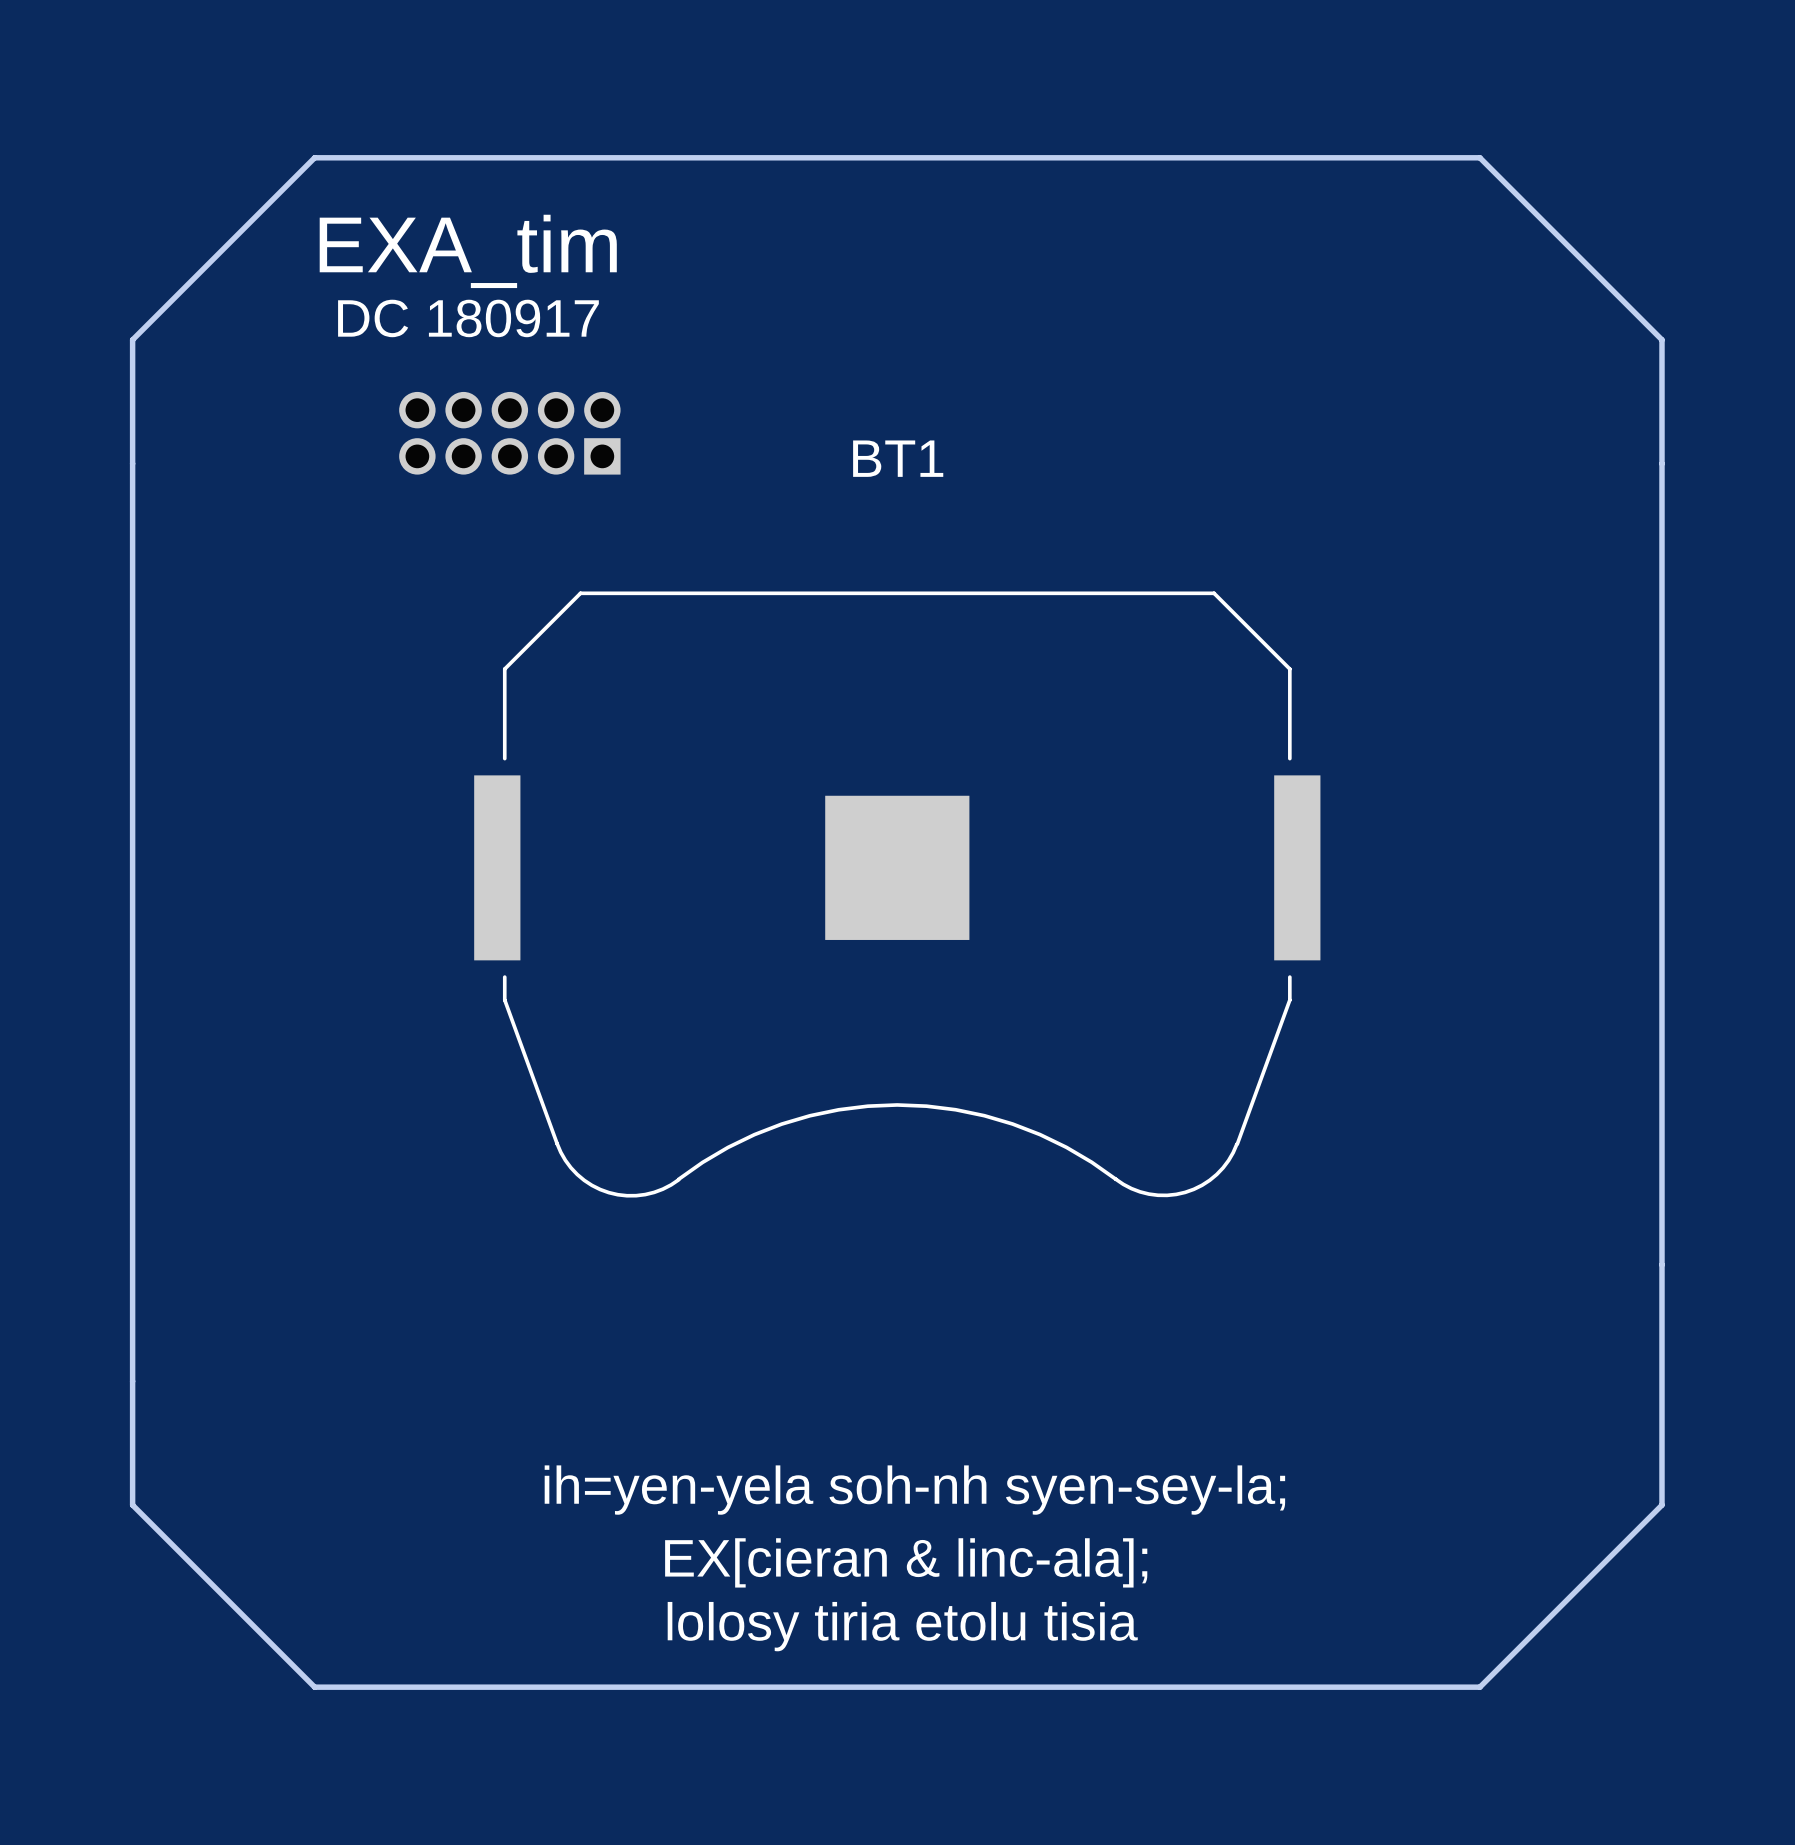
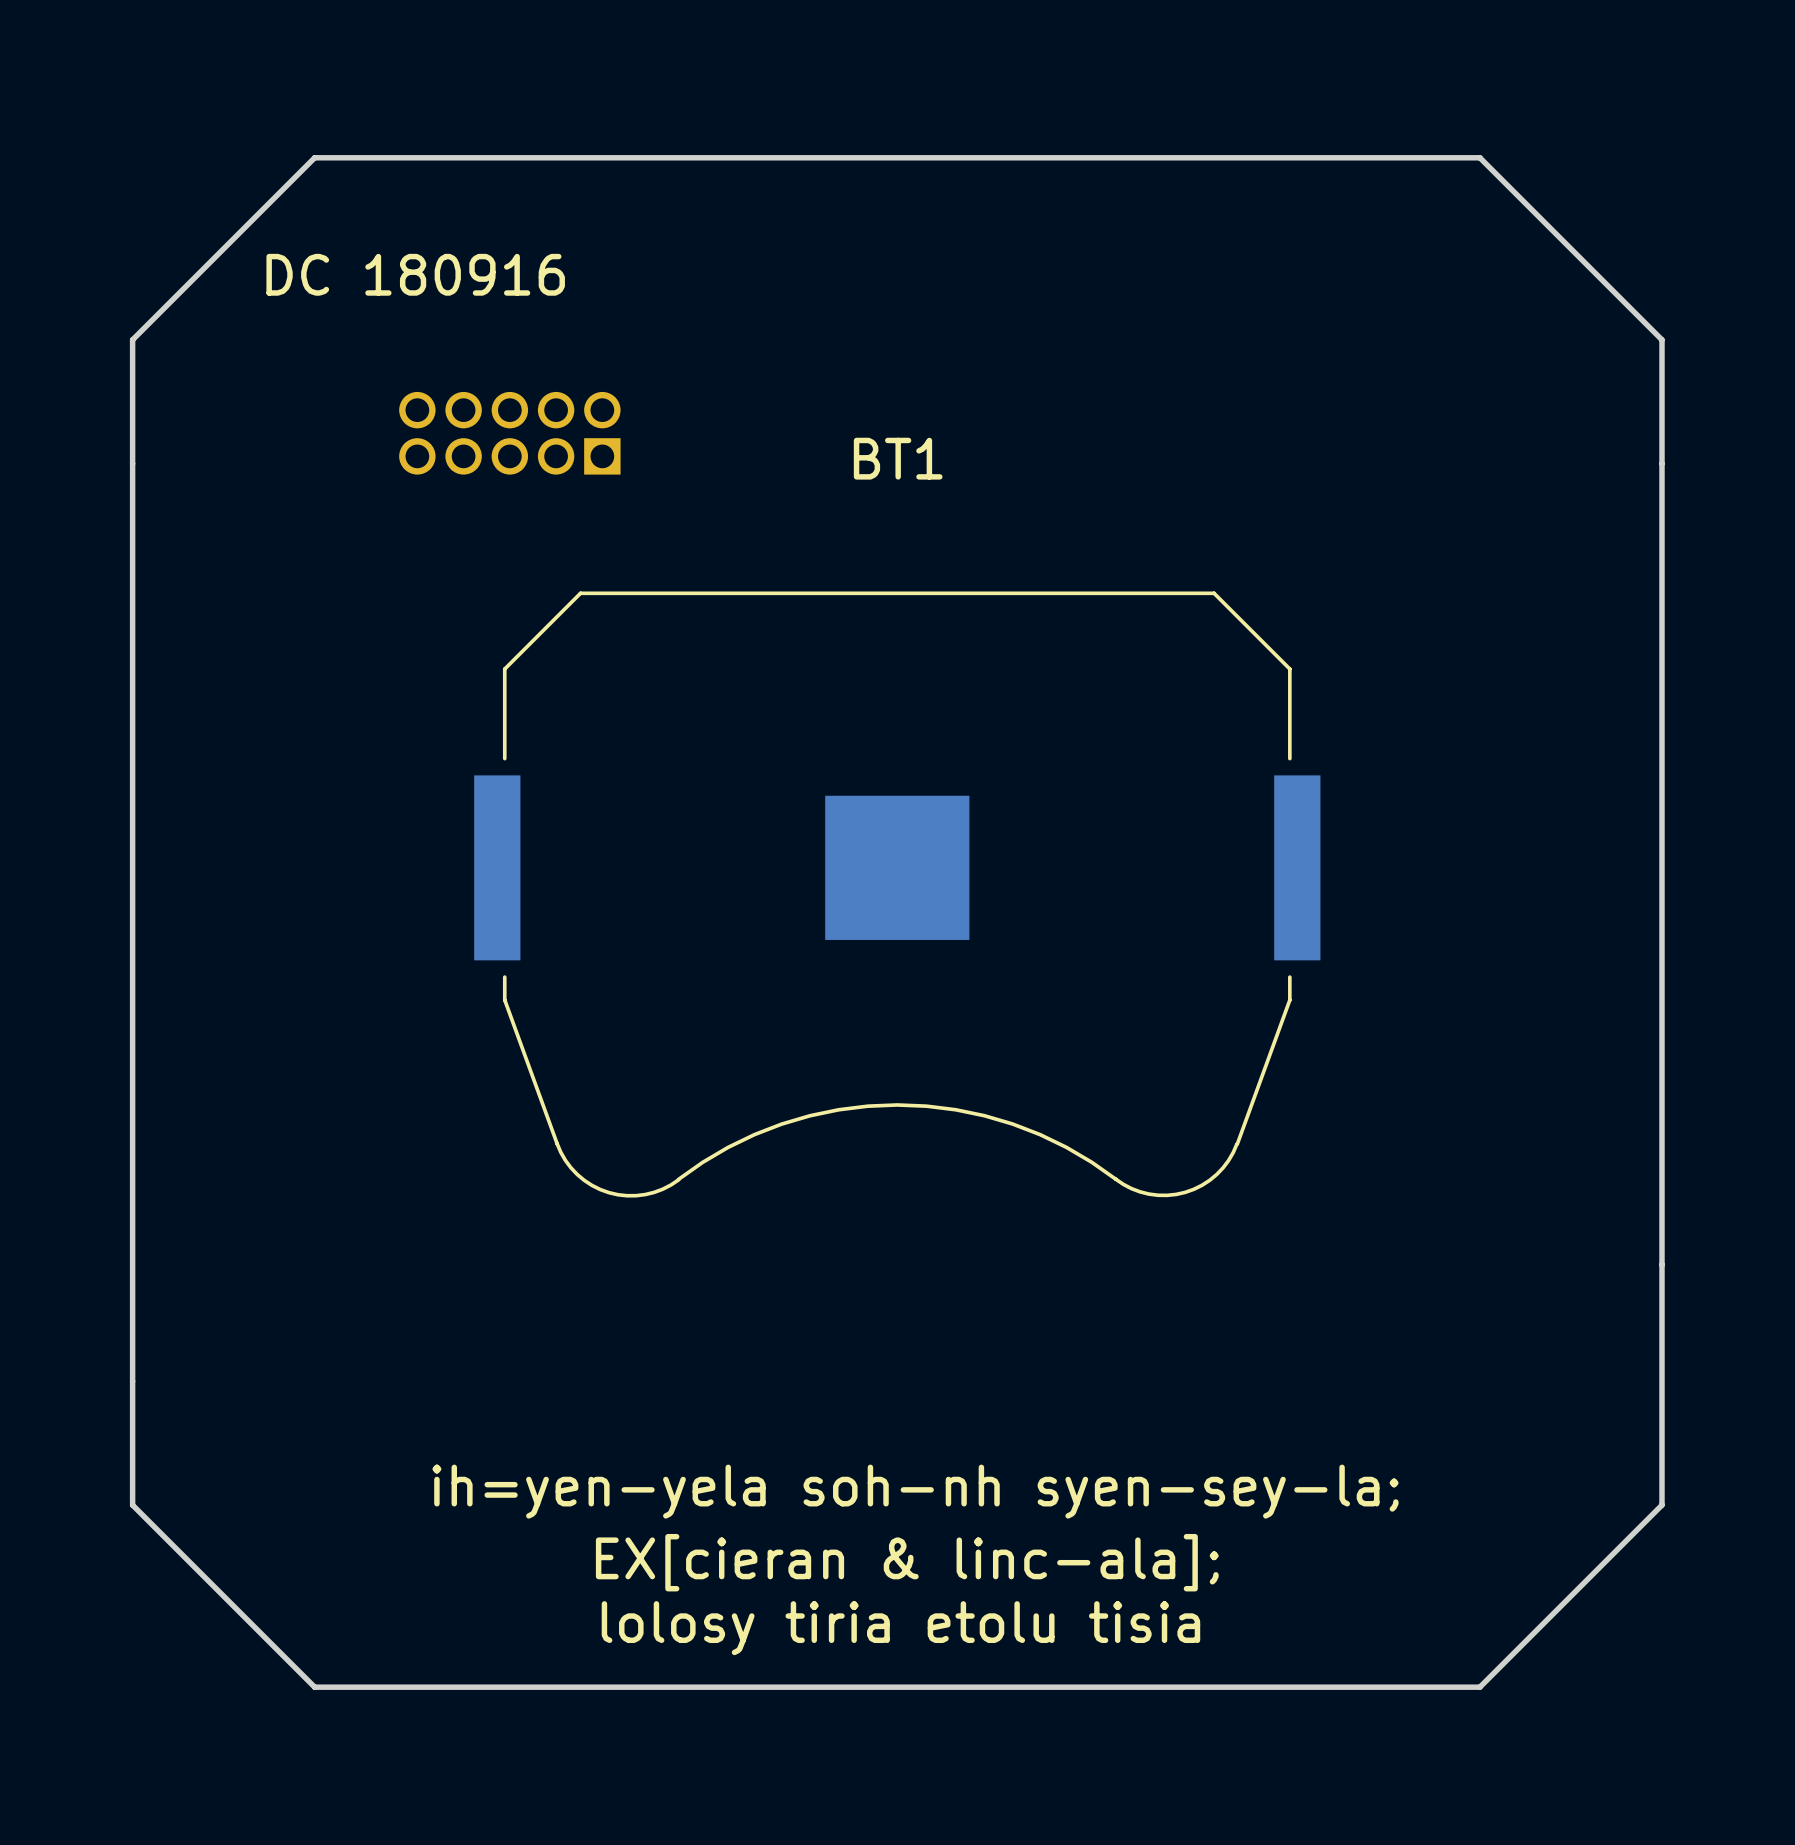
text: EXA_tim (468, 251) -> none
text: DC 180917 (468, 318) -> DC 180916 (415, 274)

